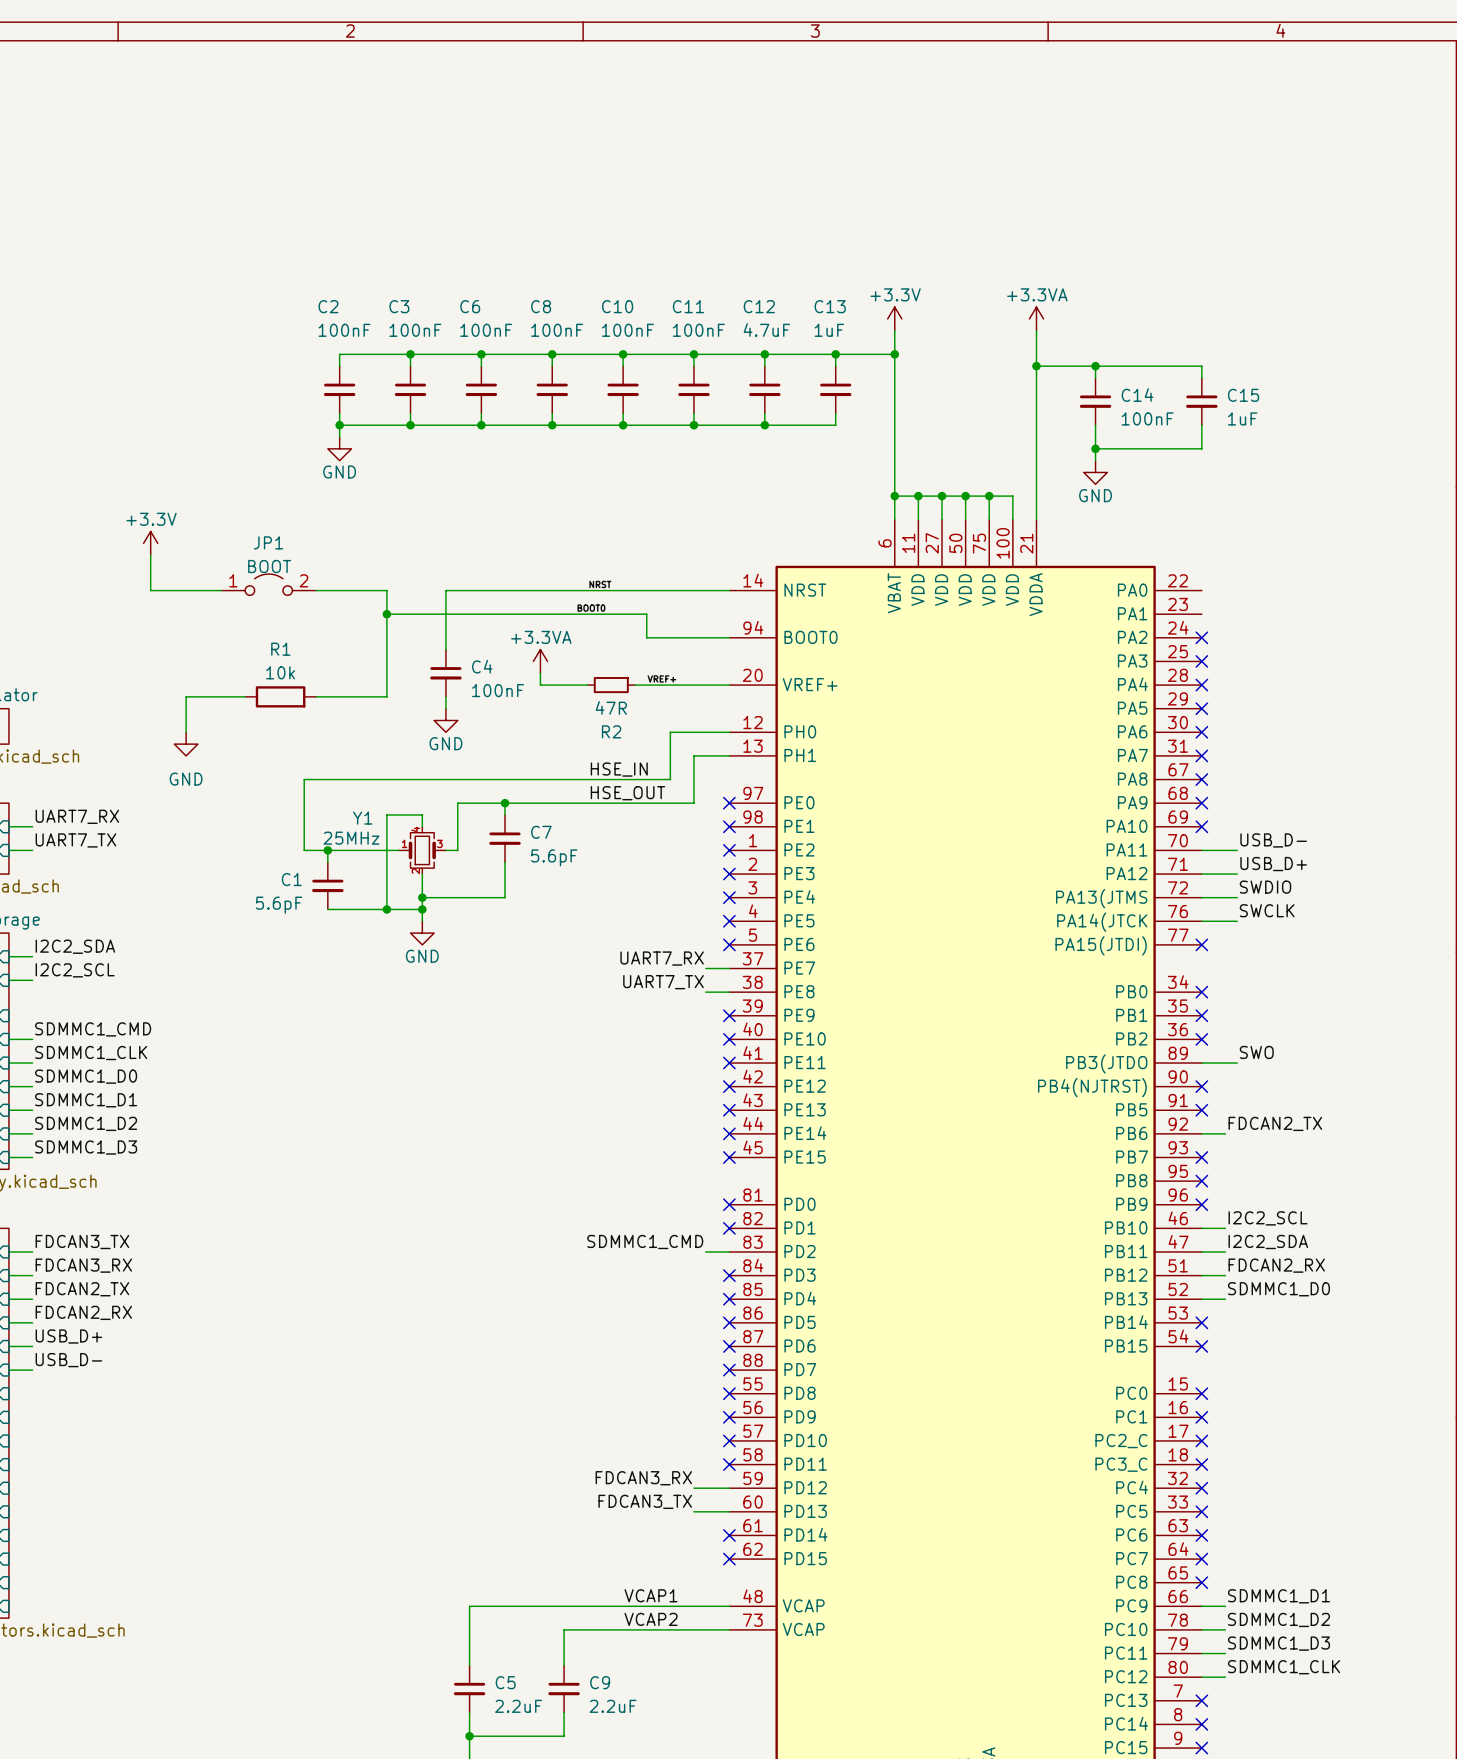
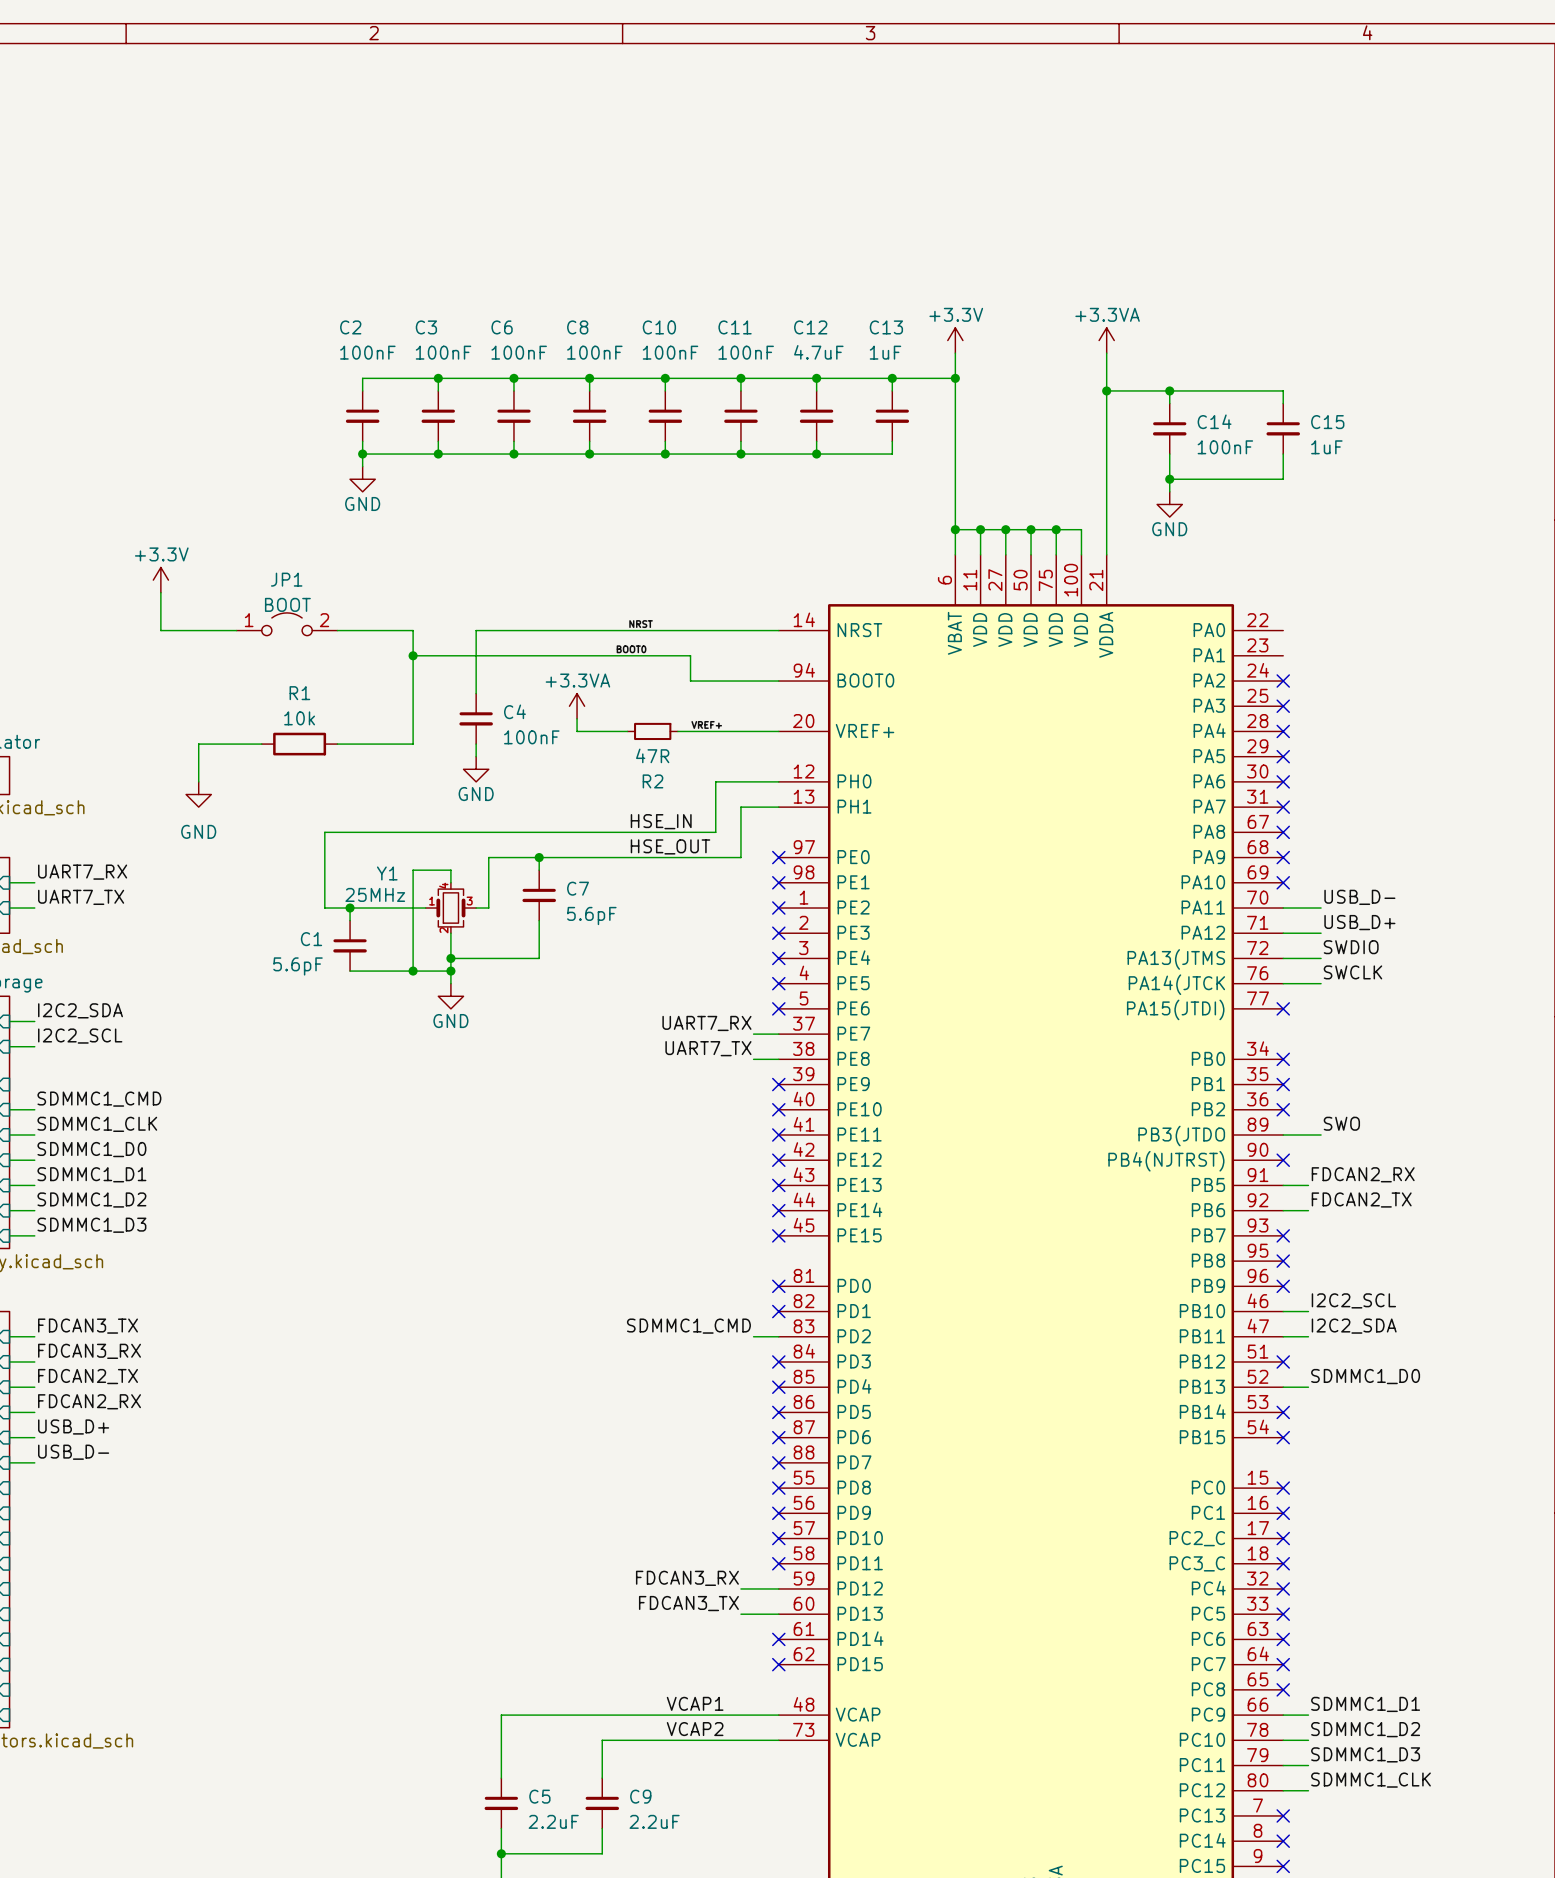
no-connect mark: (1201, 1110) -> none
label position: FDCAN2_RX (1276, 1265) -> FDCAN2_RX (1363, 1174)
wire: (1201, 1275) (1225, 1275) -> (1283, 1185) (1308, 1185)
no-connect mark: none -> (1283, 1361)

